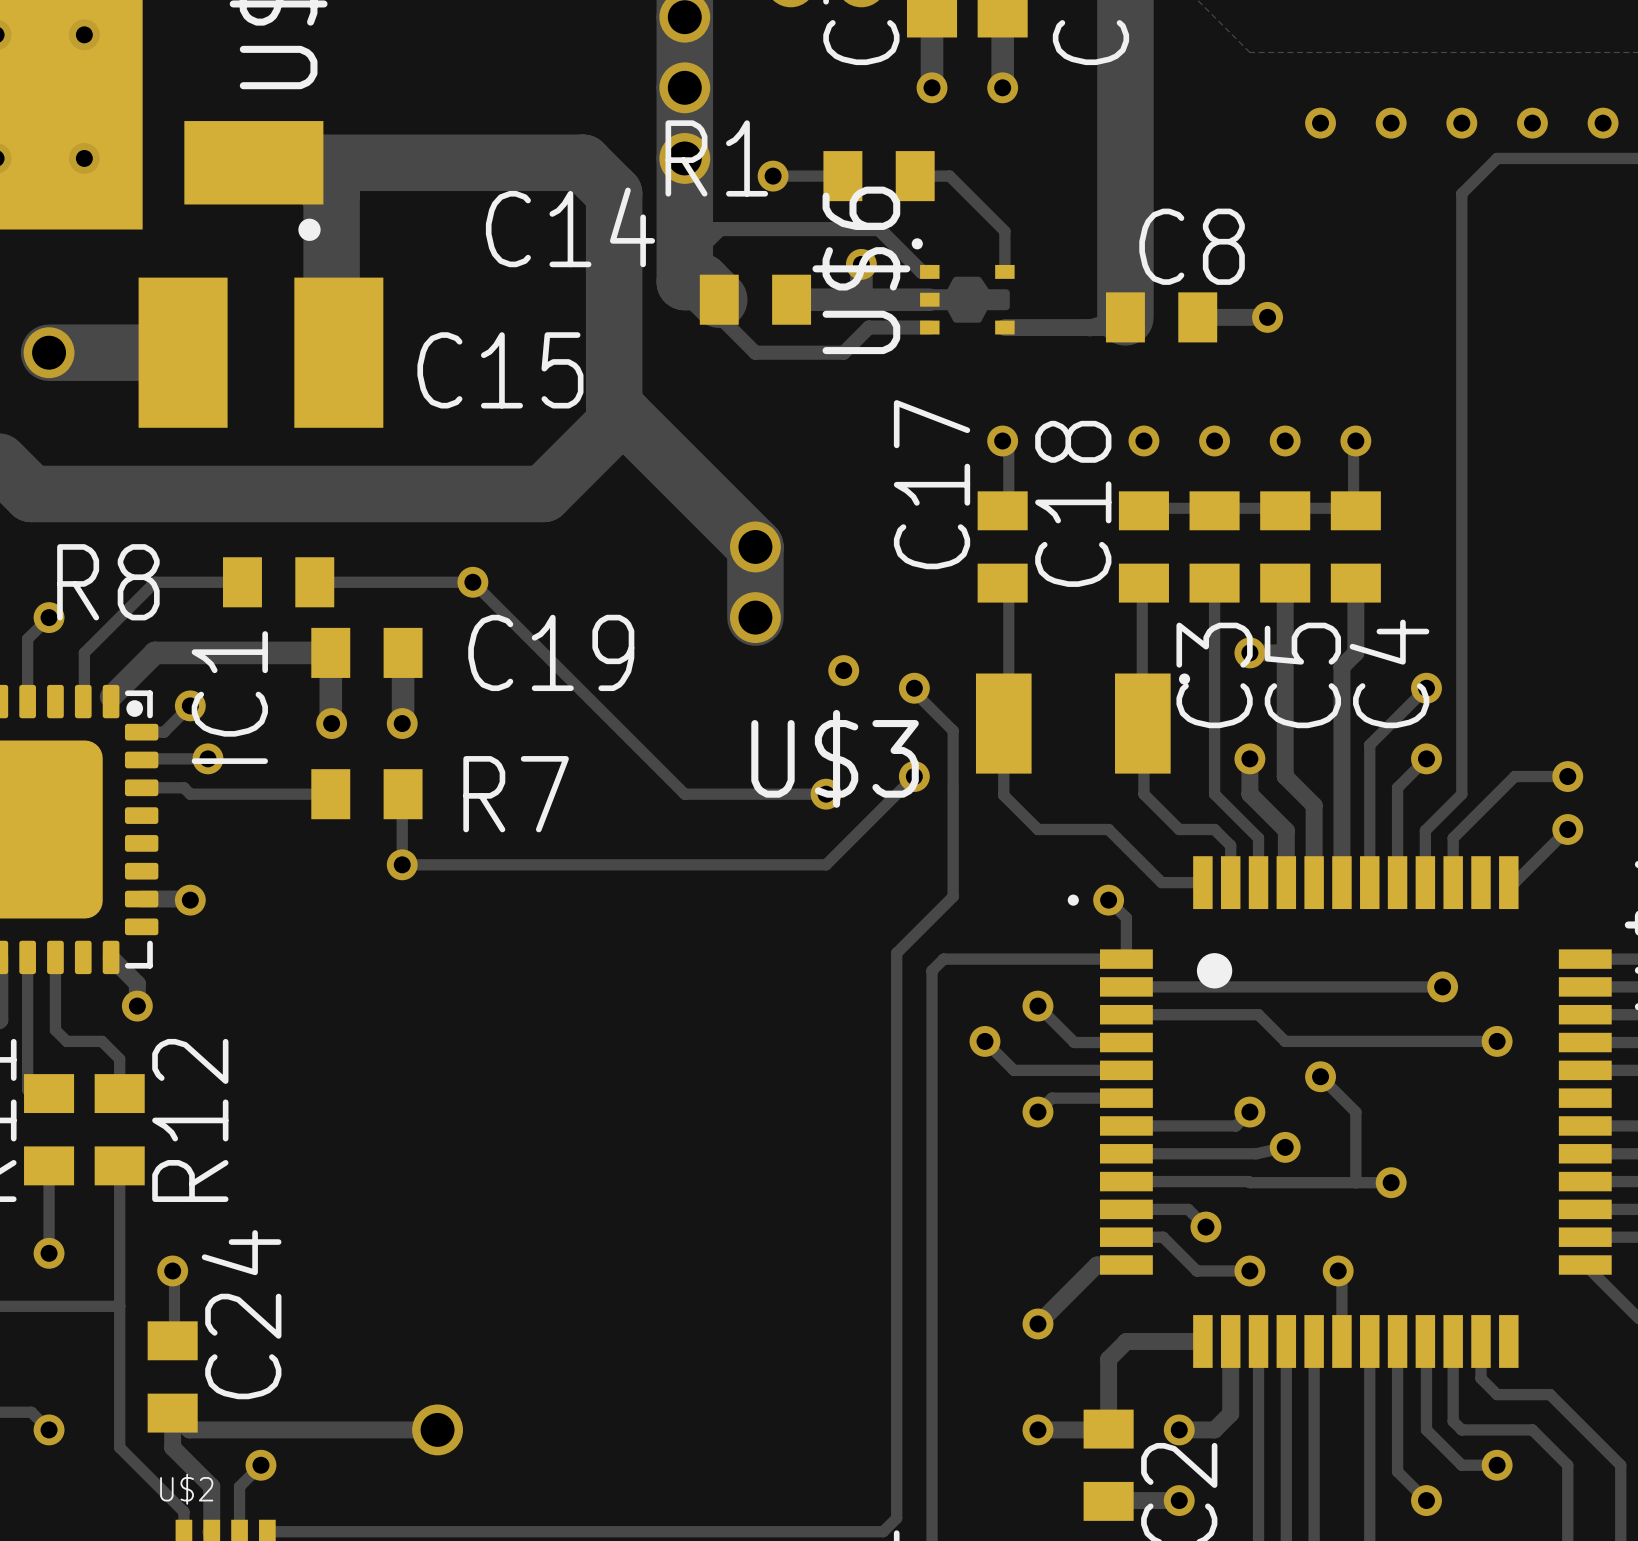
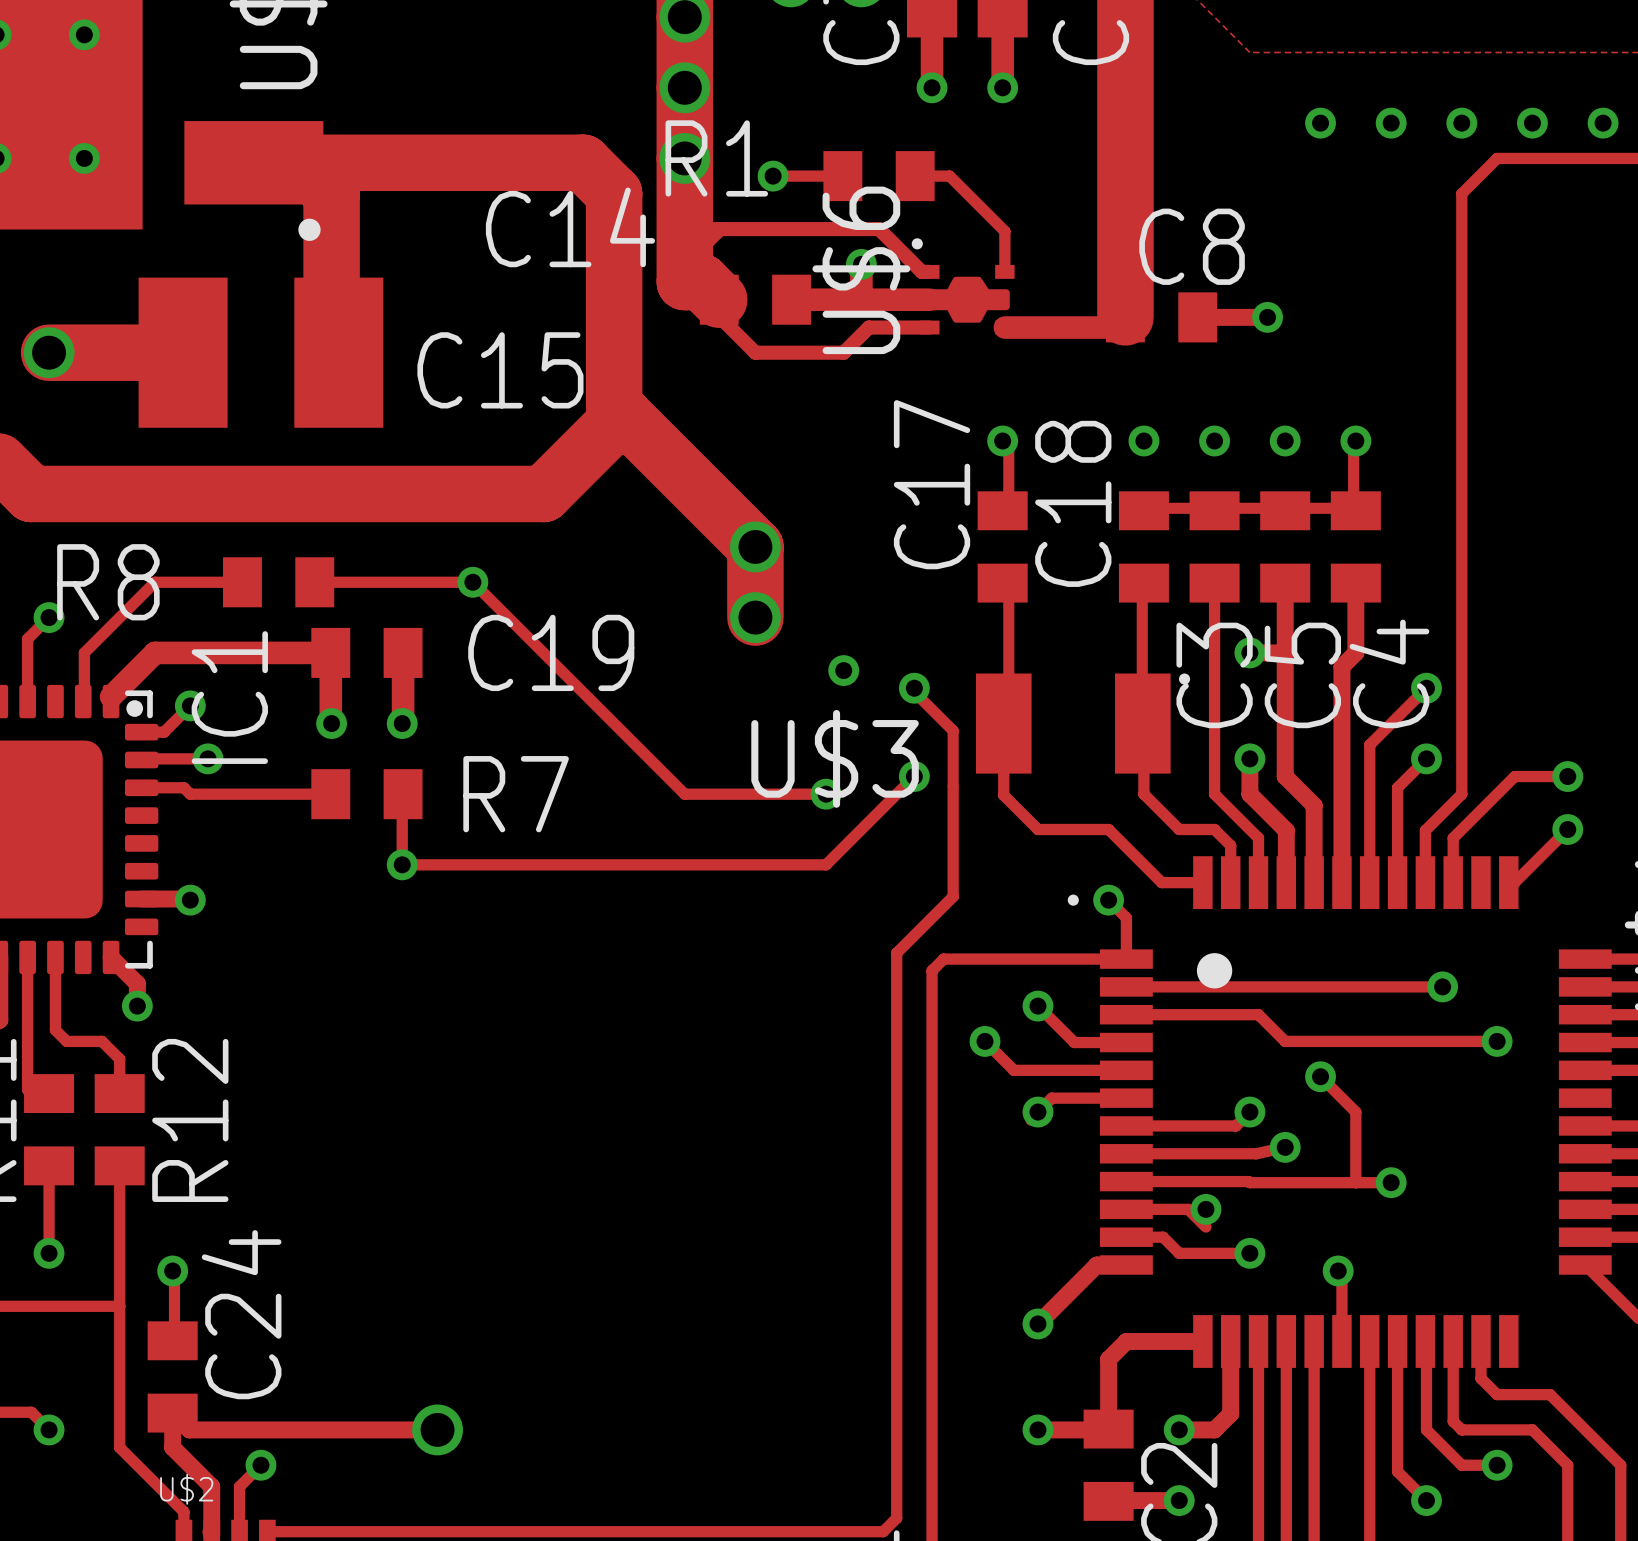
track width: thin (1004, 327) (1115, 327) -> thick (1004, 327) (1115, 327)
via position: (1205, 1227) -> (1205, 1209)
track: (1179, 1253) (1196, 1270) (1249, 1270) -> (1179, 1253) (1249, 1253)
via position: (1249, 1270) -> (1249, 1253)

